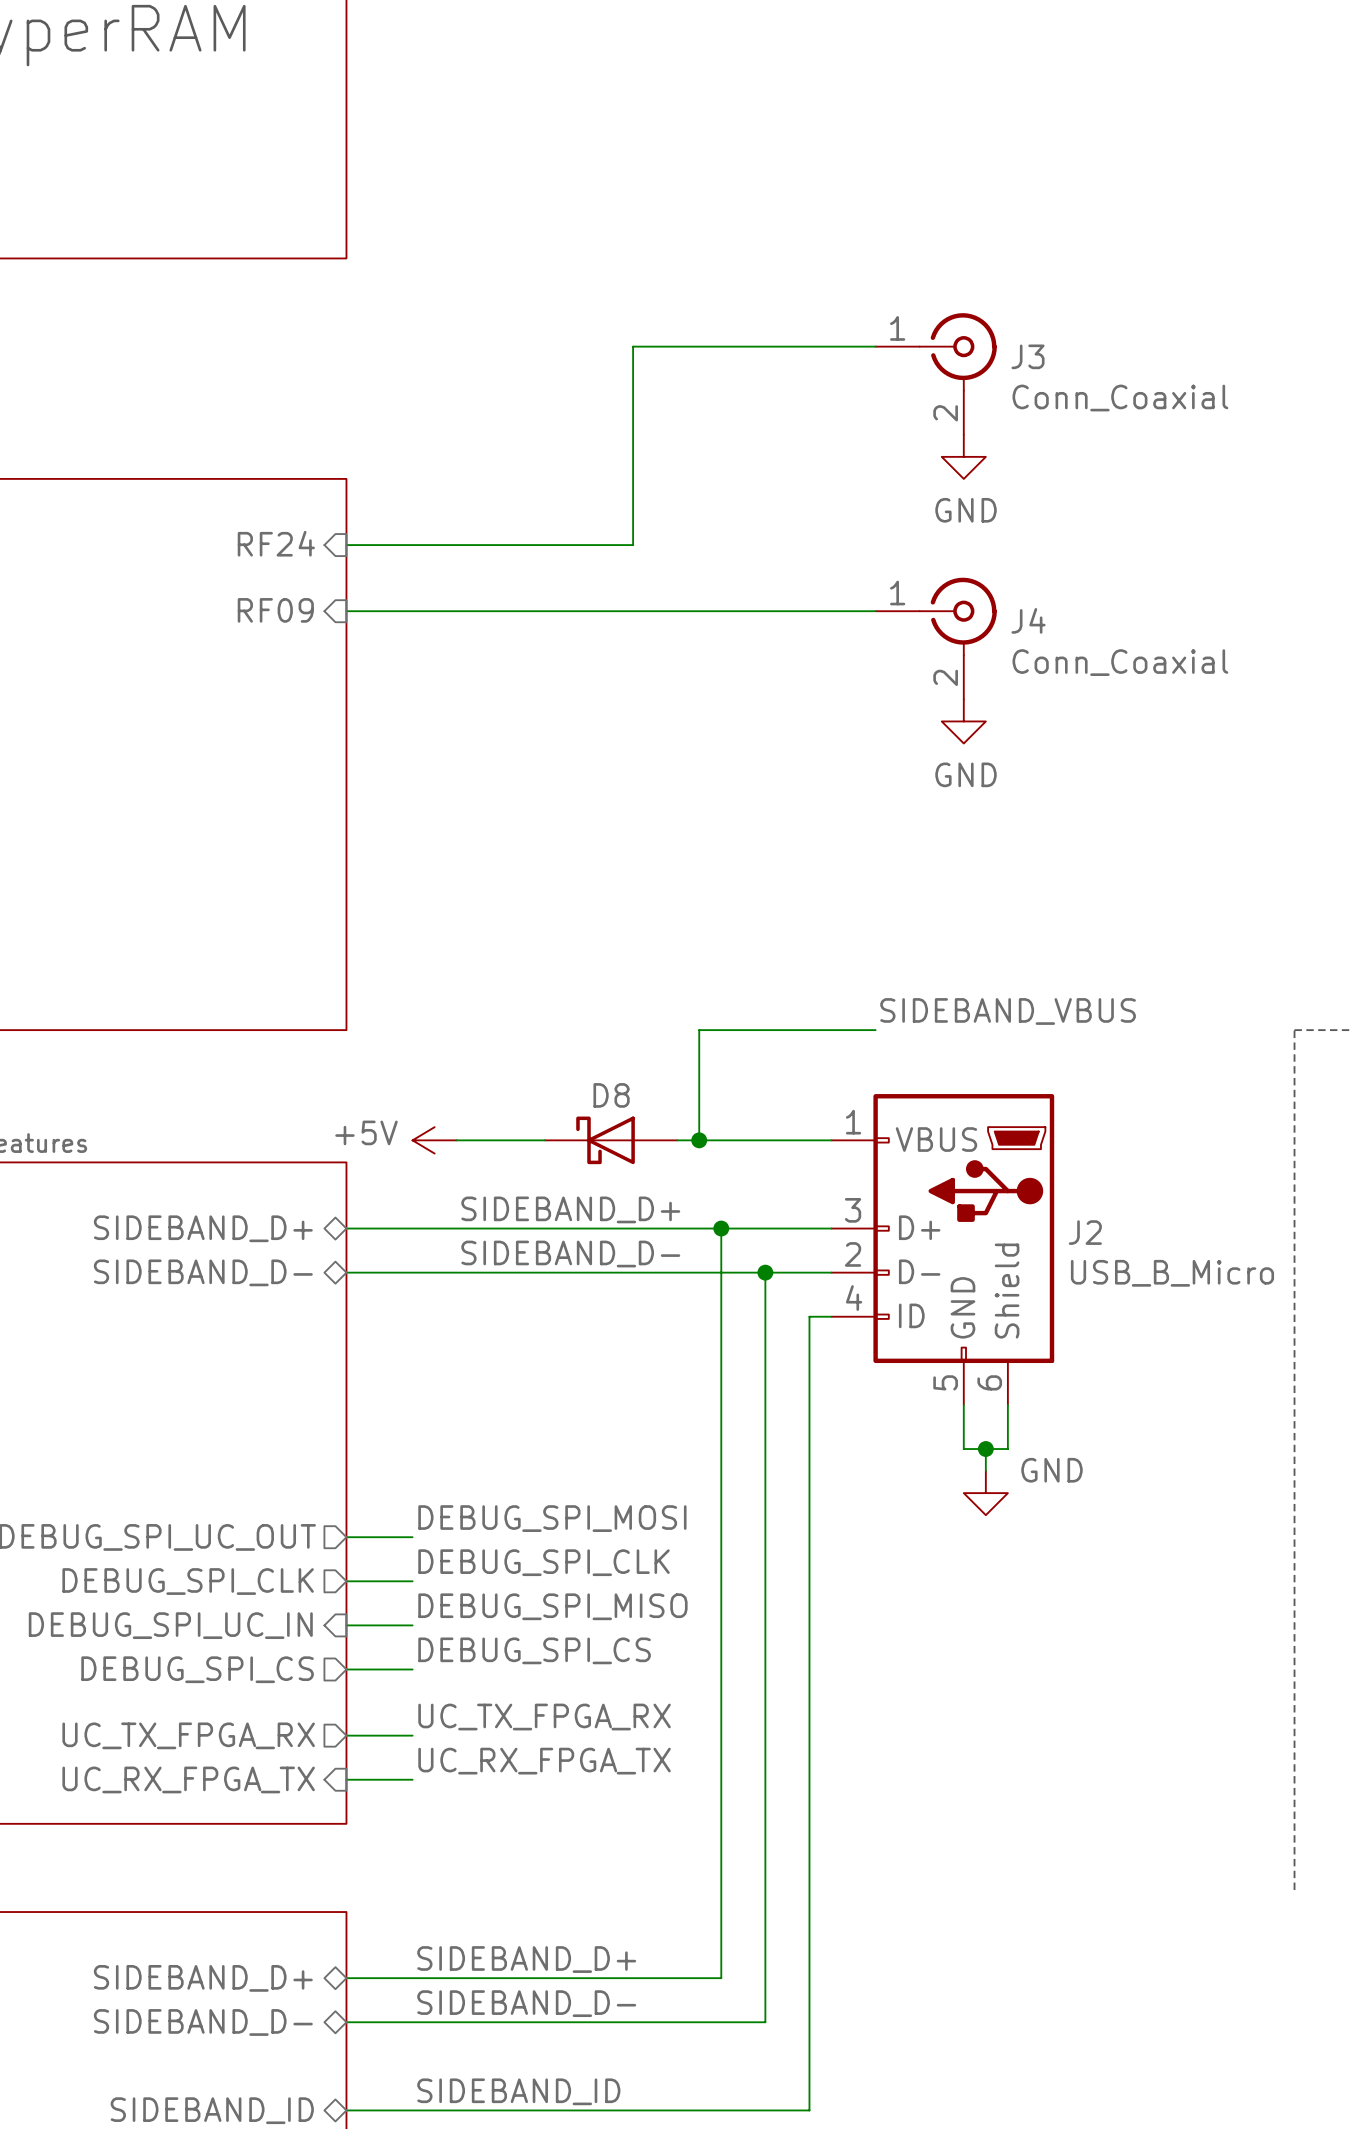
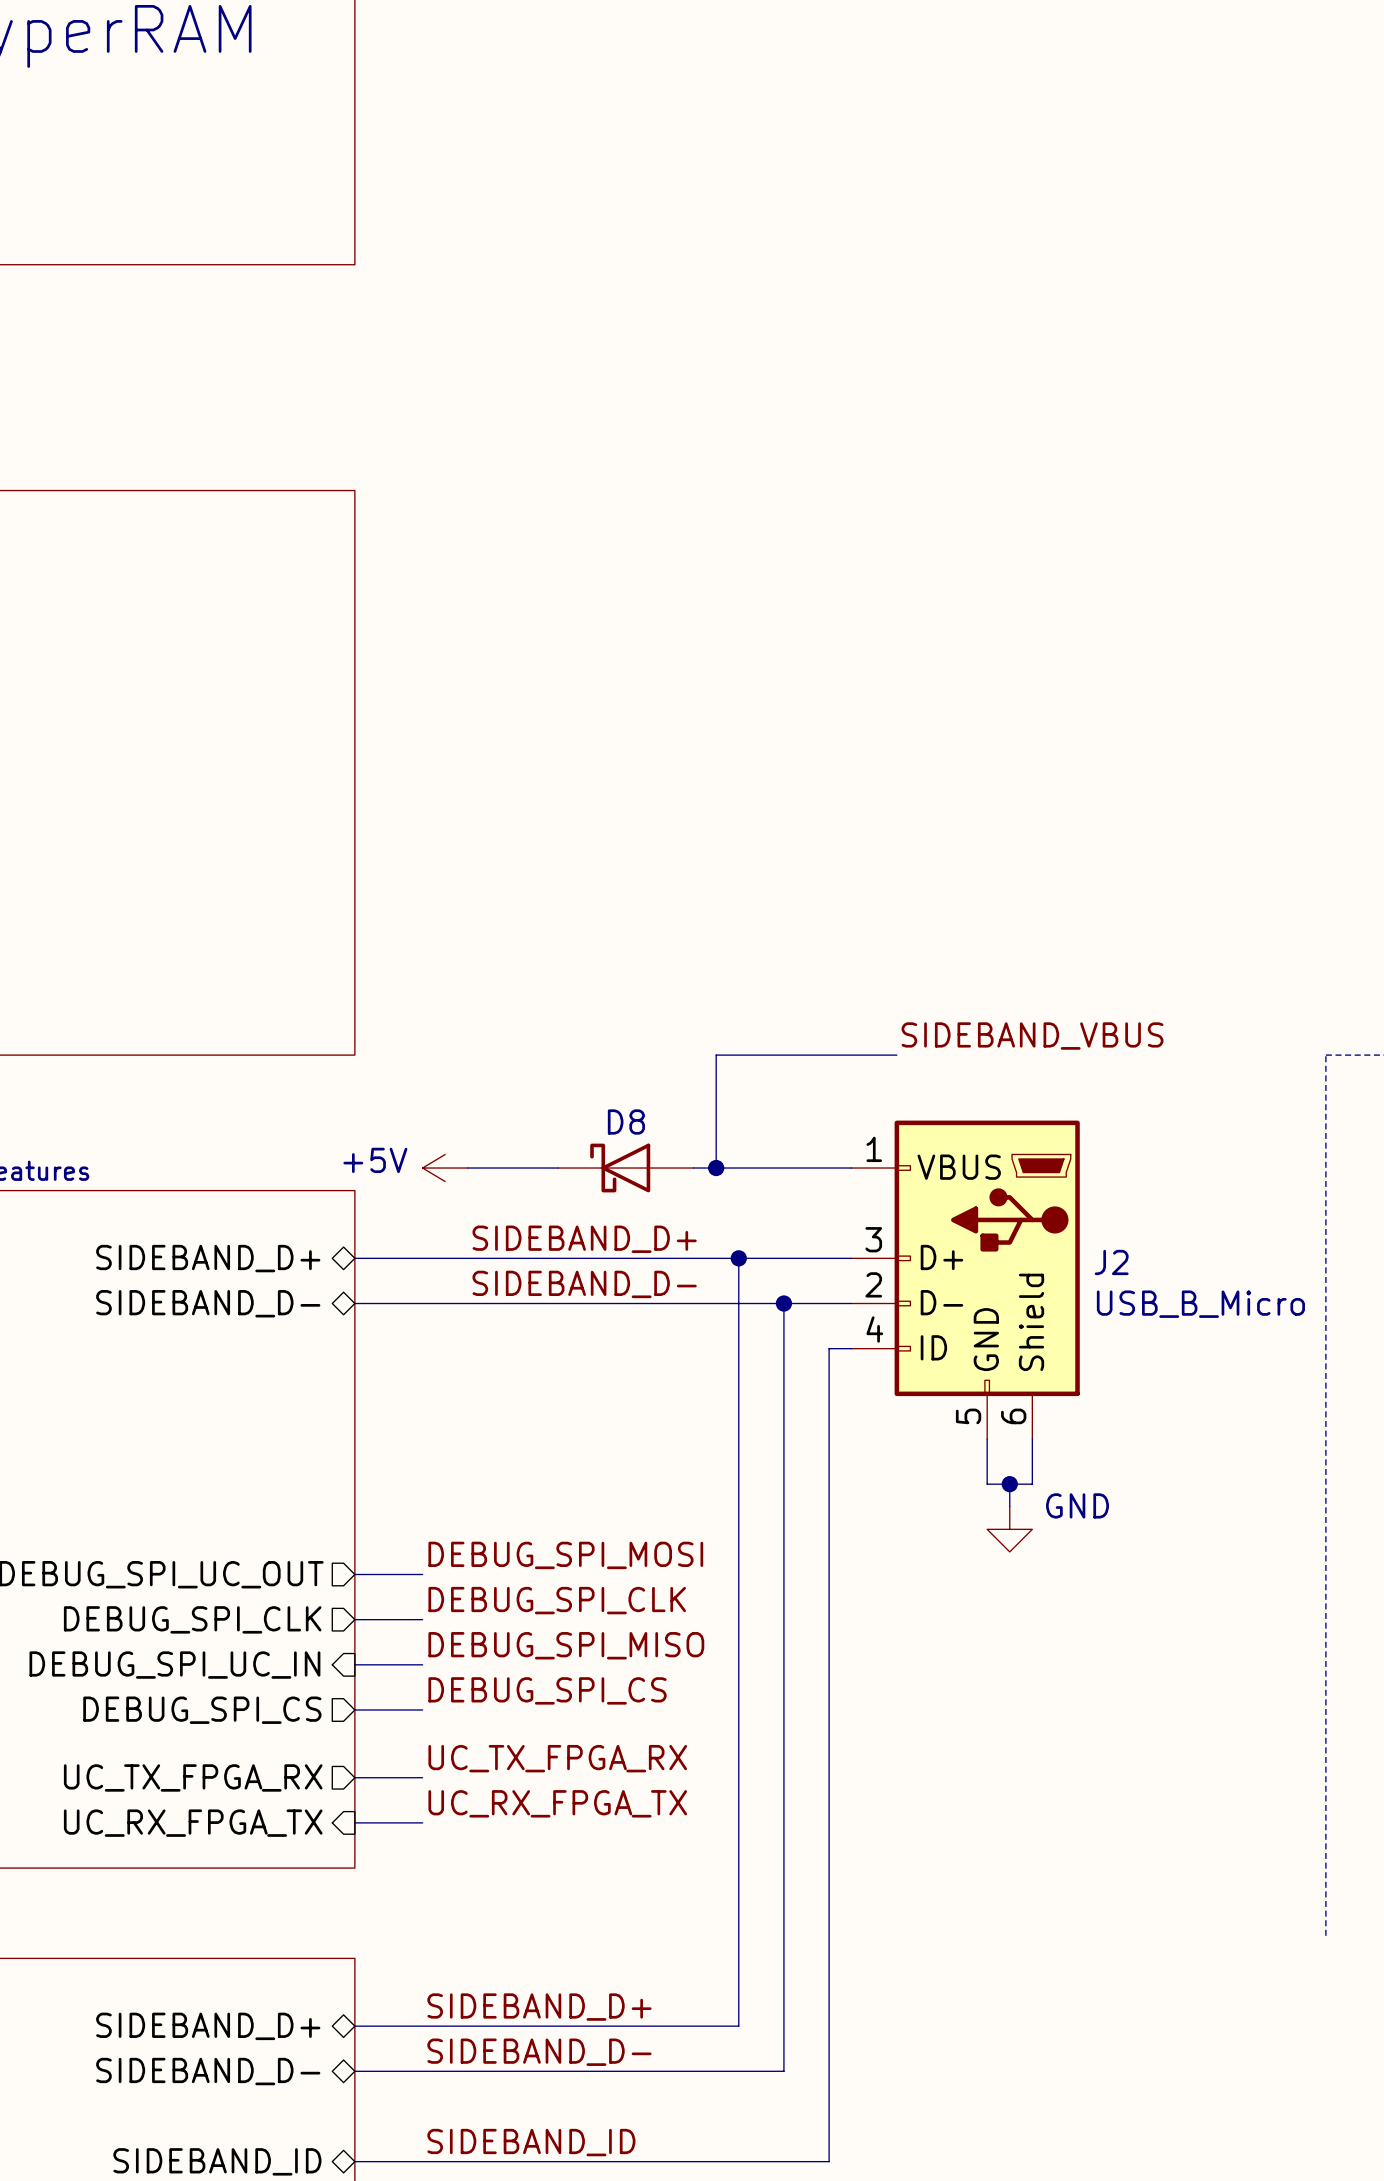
wire: (875, 346) (633, 346) (633, 545) (346, 545) -> none
J3: Conn_Coaxial (936, 373) -> none
power symbol: GND (963, 456) -> none
sheet pin: RF24 (276, 543) -> none
sheet pin: RF09 (275, 610) -> none
wire: (346, 611) (875, 611) -> none
J4: Conn_Coaxial (936, 638) -> none
power symbol: GND (963, 721) -> none

